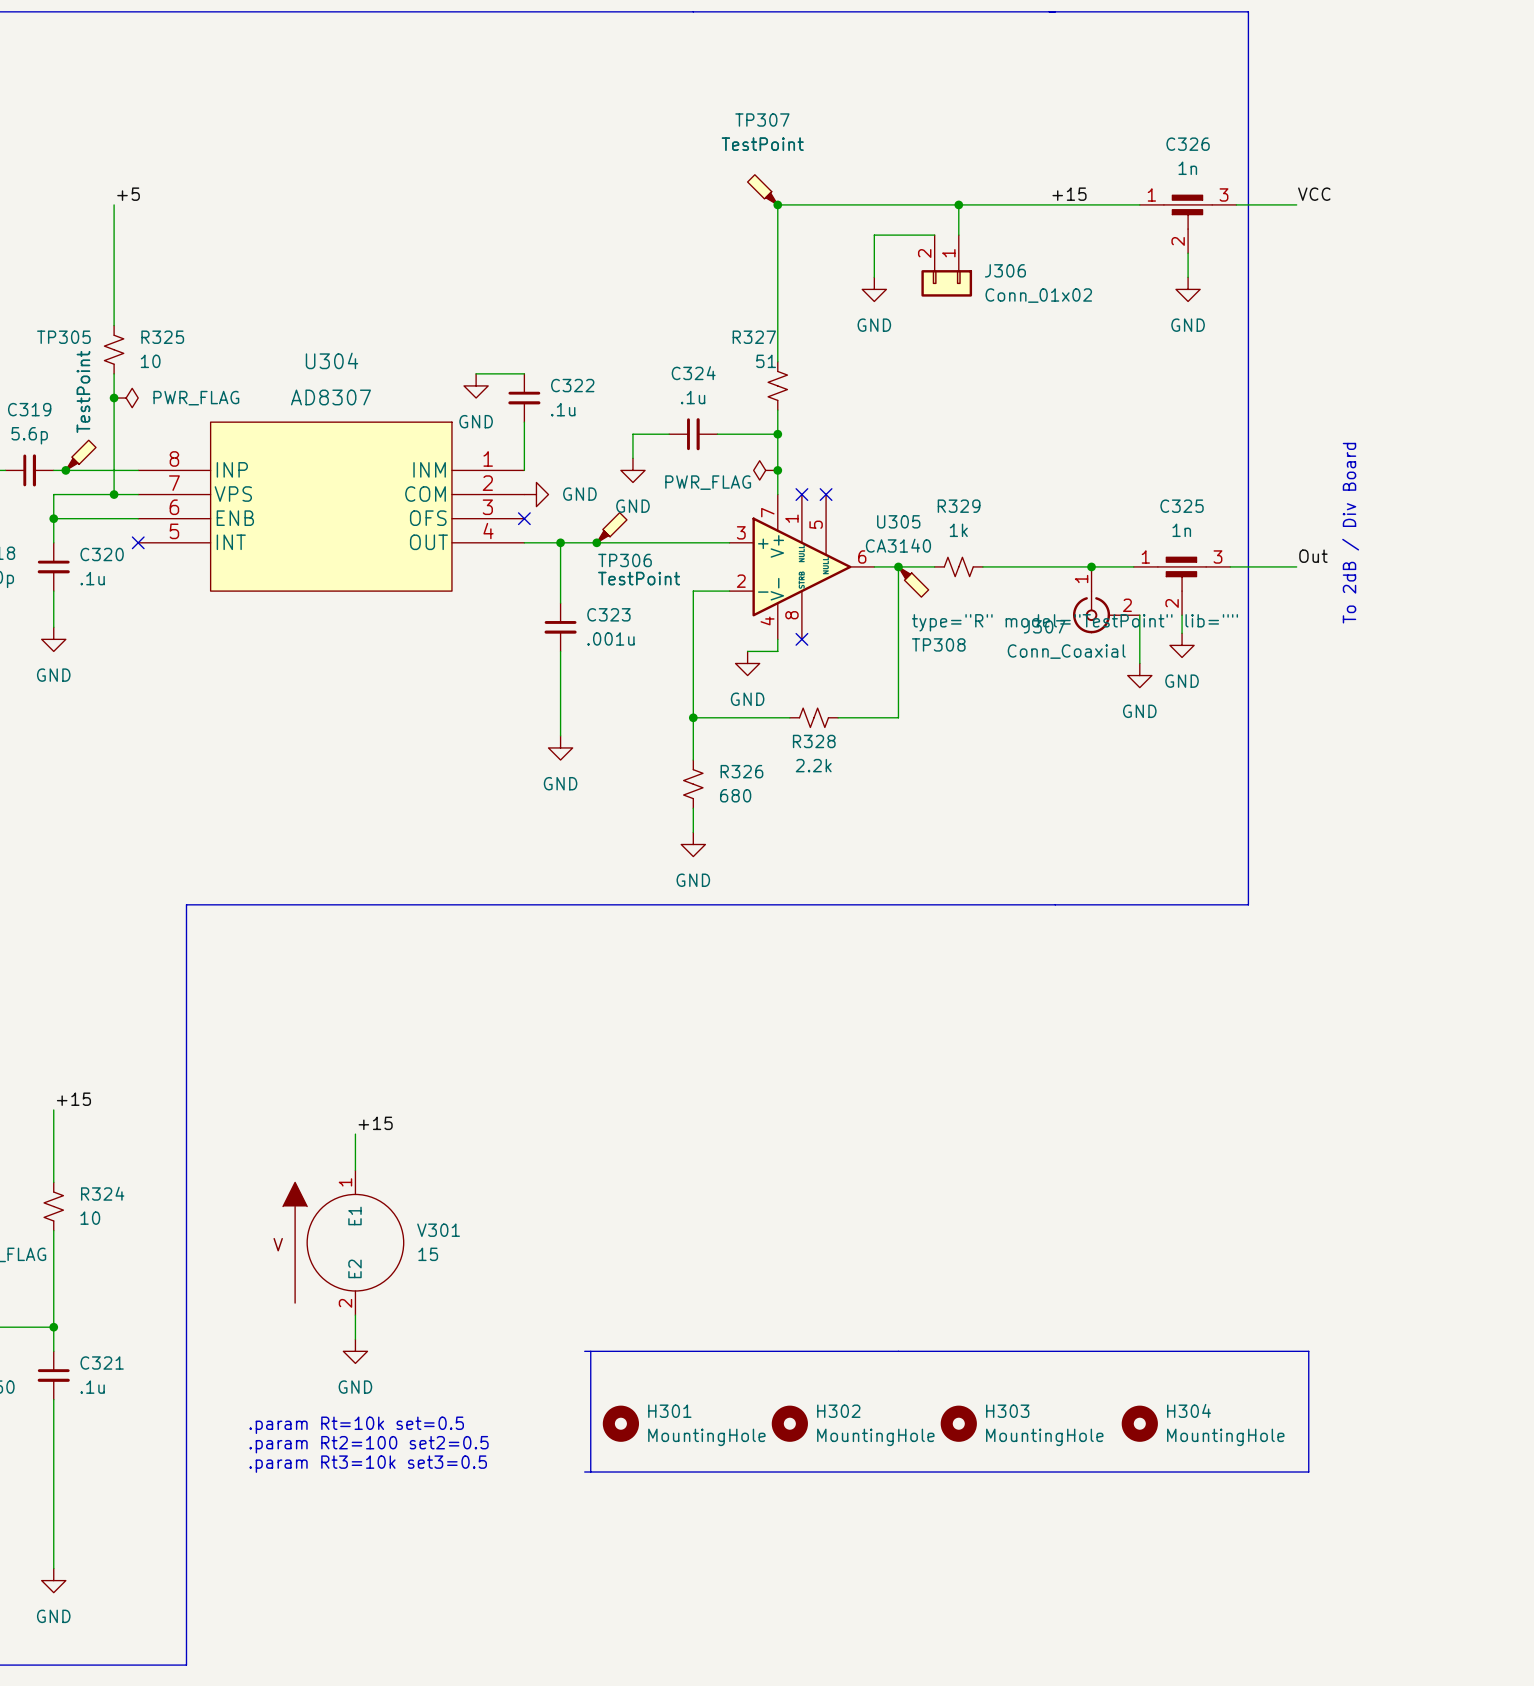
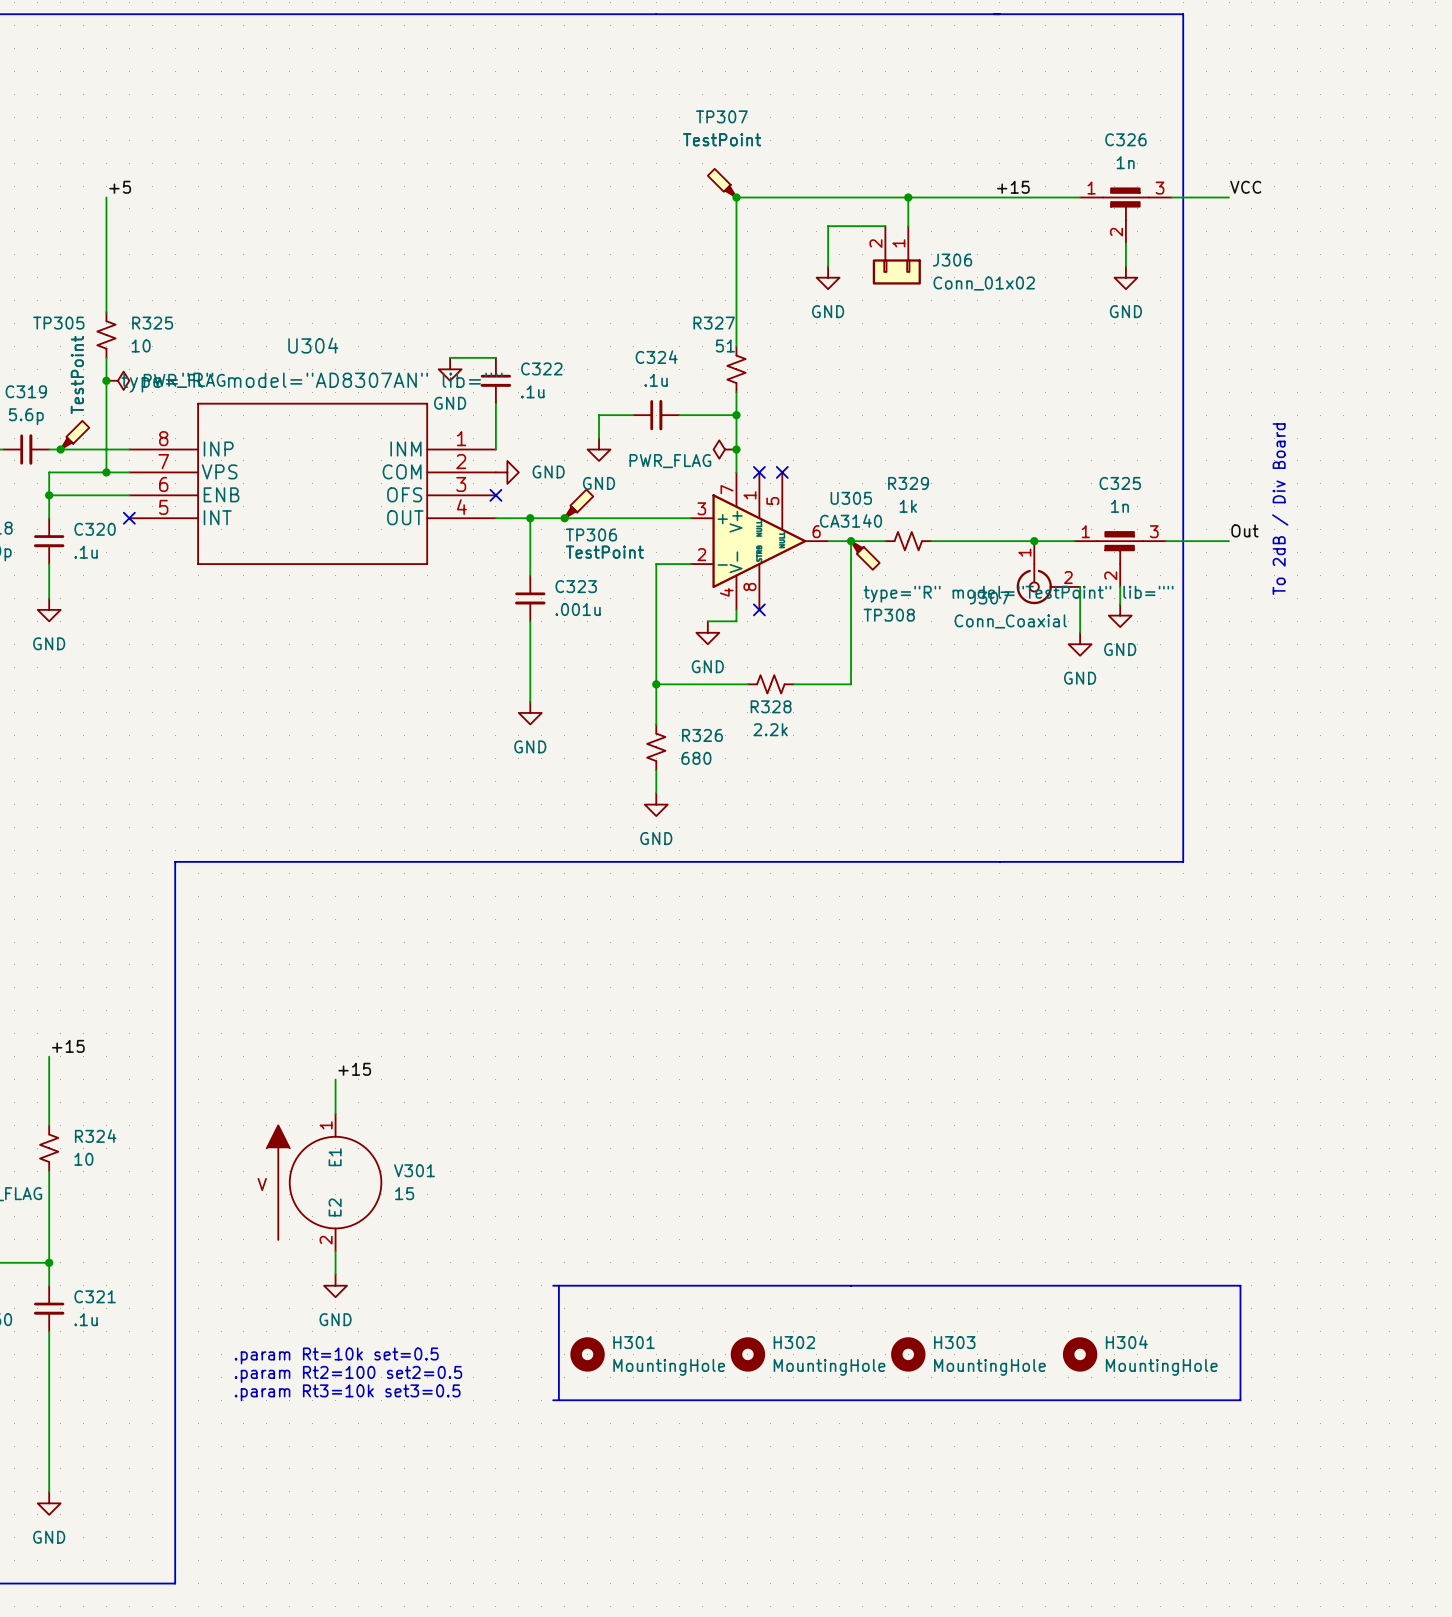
U304 value: AD8307 (330, 397) -> type="R" model="AD8307AN" lib="" (311, 382)
U304 symbol: [138, 422, 525, 592] -> [129, 403, 496, 565]

